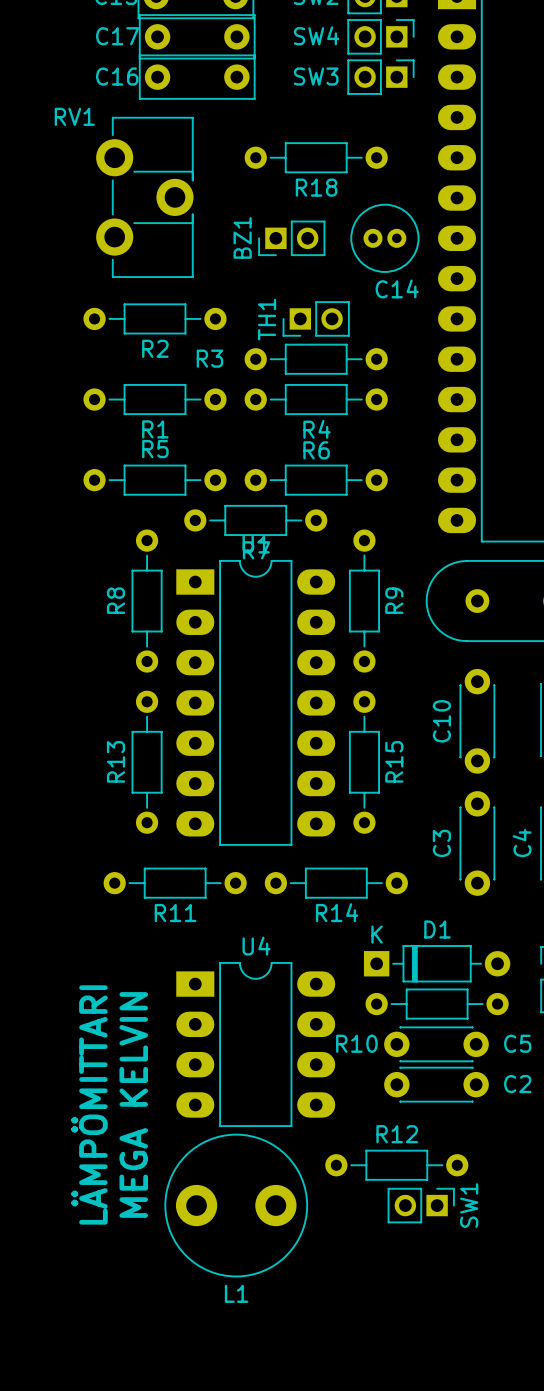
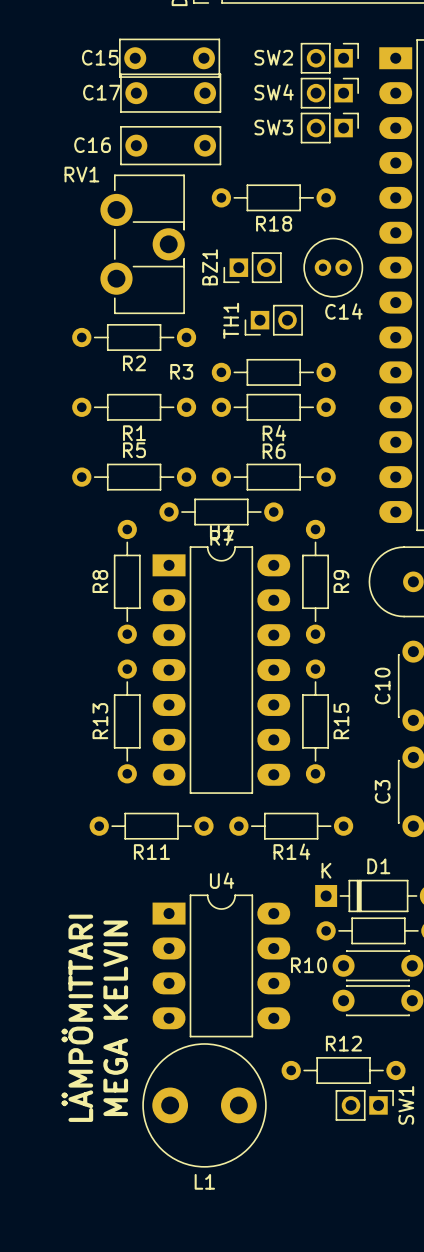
C16 name position: C16 (117, 76) -> C16 (92, 145)
C16 position: (197, 77) -> (170, 145)
RV1 position: (144, 197) -> (142, 244)
TH1 position: (316, 318) -> (273, 320)

